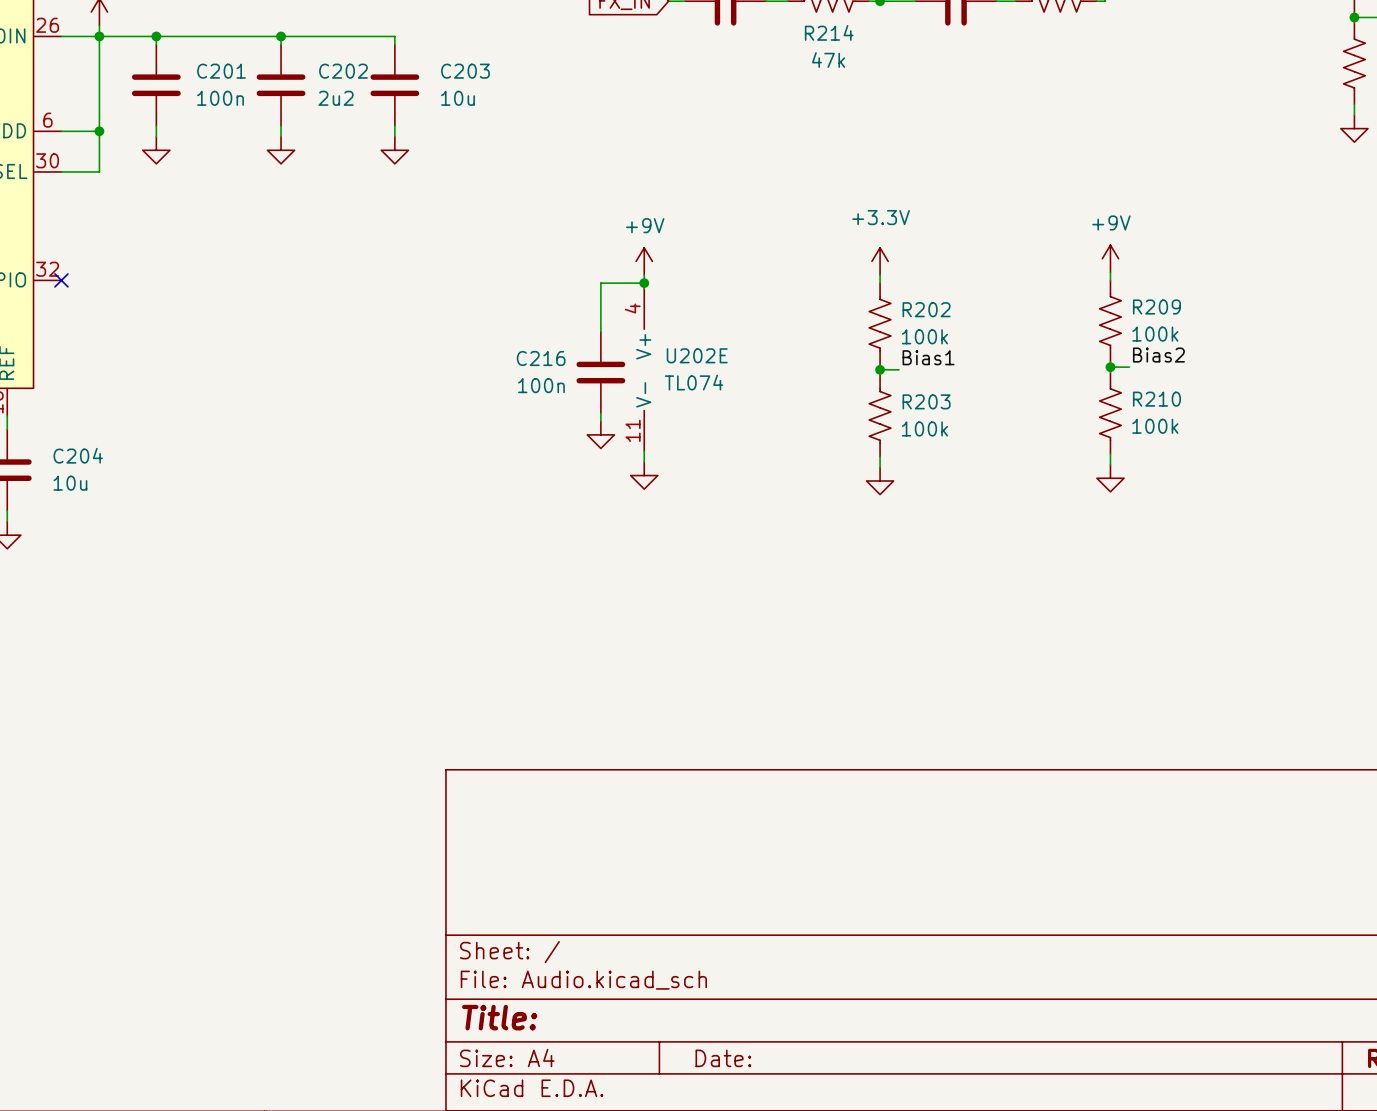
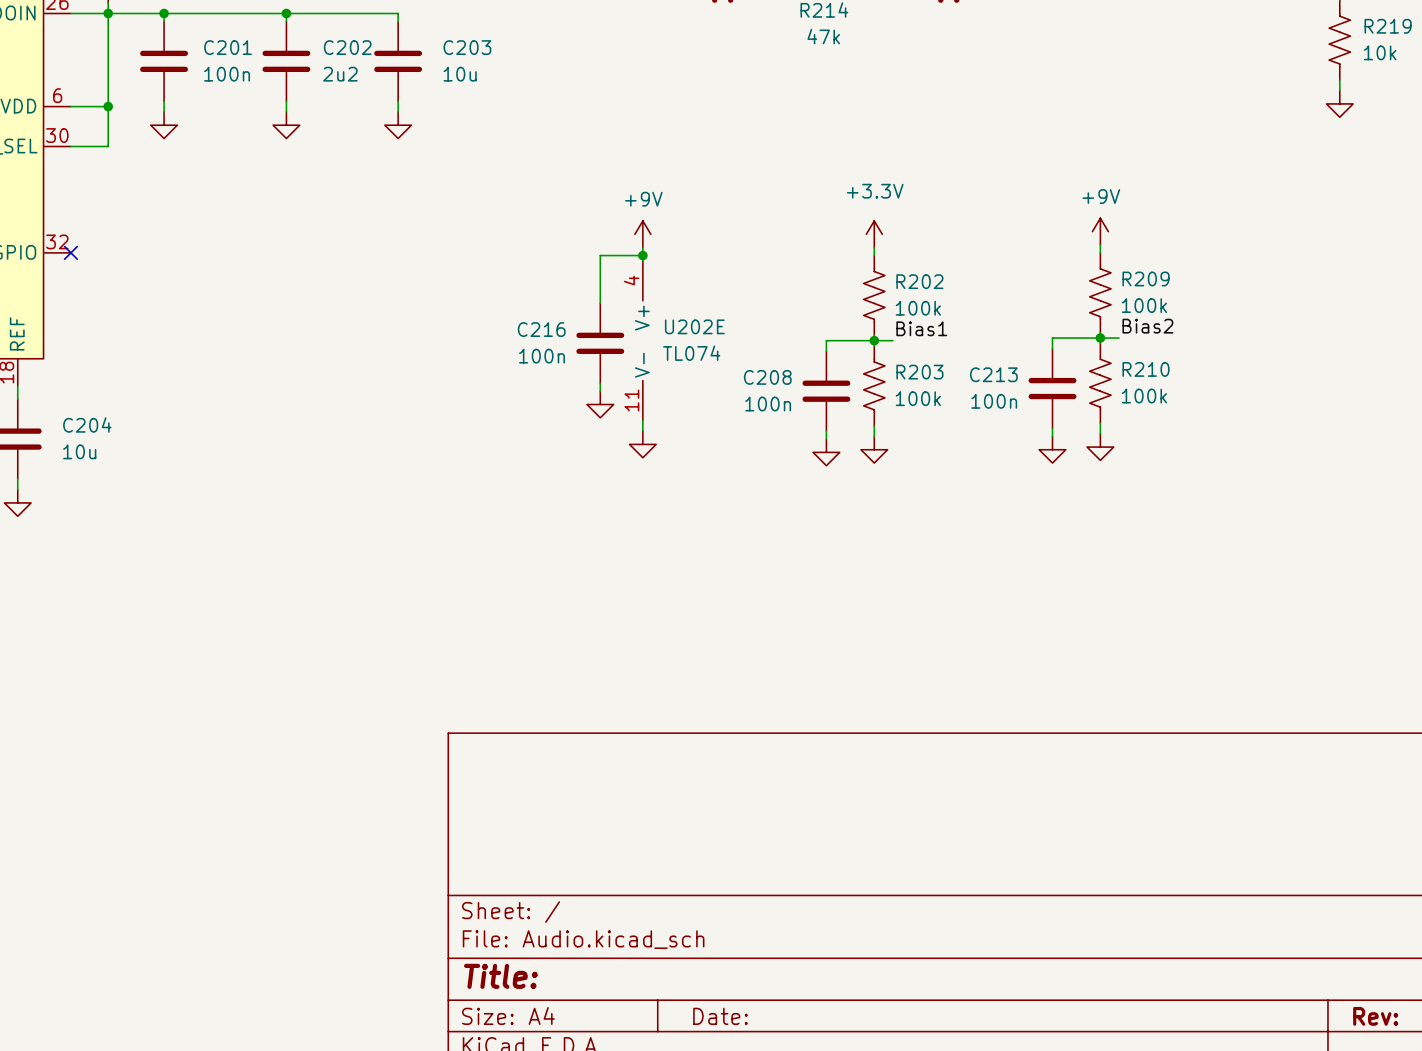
wire: none -> (1100, 338) (1052, 338) (1052, 348)
wire: none -> (874, 340) (826, 340) (826, 351)
C213: none -> 100n (1052, 388)
C208: none -> 100n (826, 391)
wire: none -> (1052, 428) (1052, 436)
wire: none -> (826, 431) (826, 439)
power symbol: none -> (1052, 449)
power symbol: none -> (826, 452)

